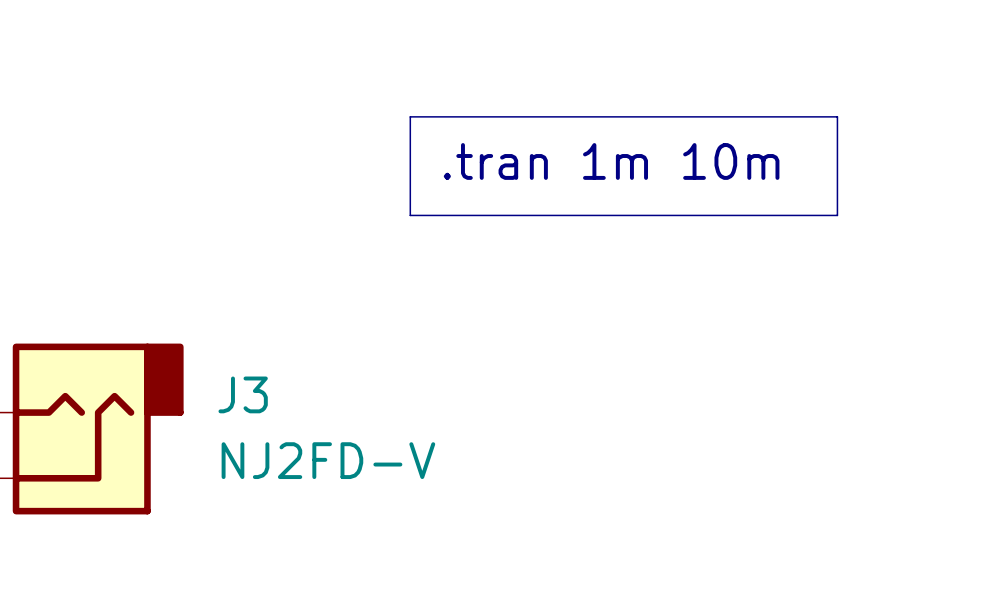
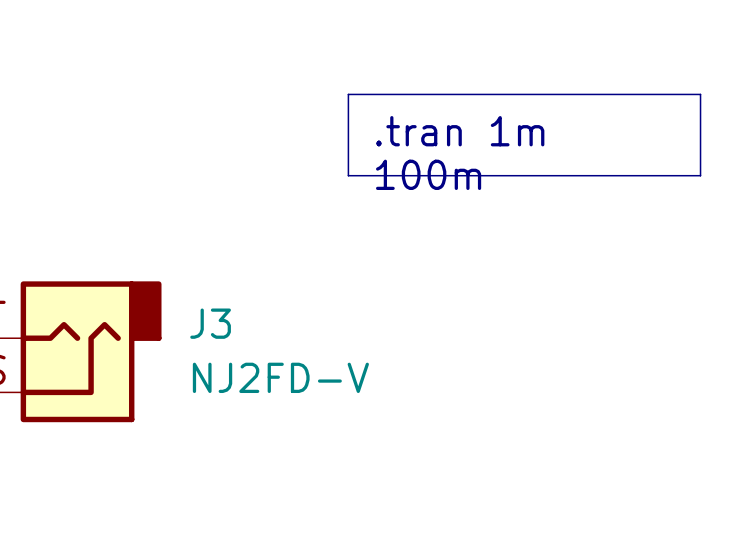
text: .tran 1m 10m (611, 161) -> .tran 1m (460, 131)
text: none -> 100m (428, 174)

